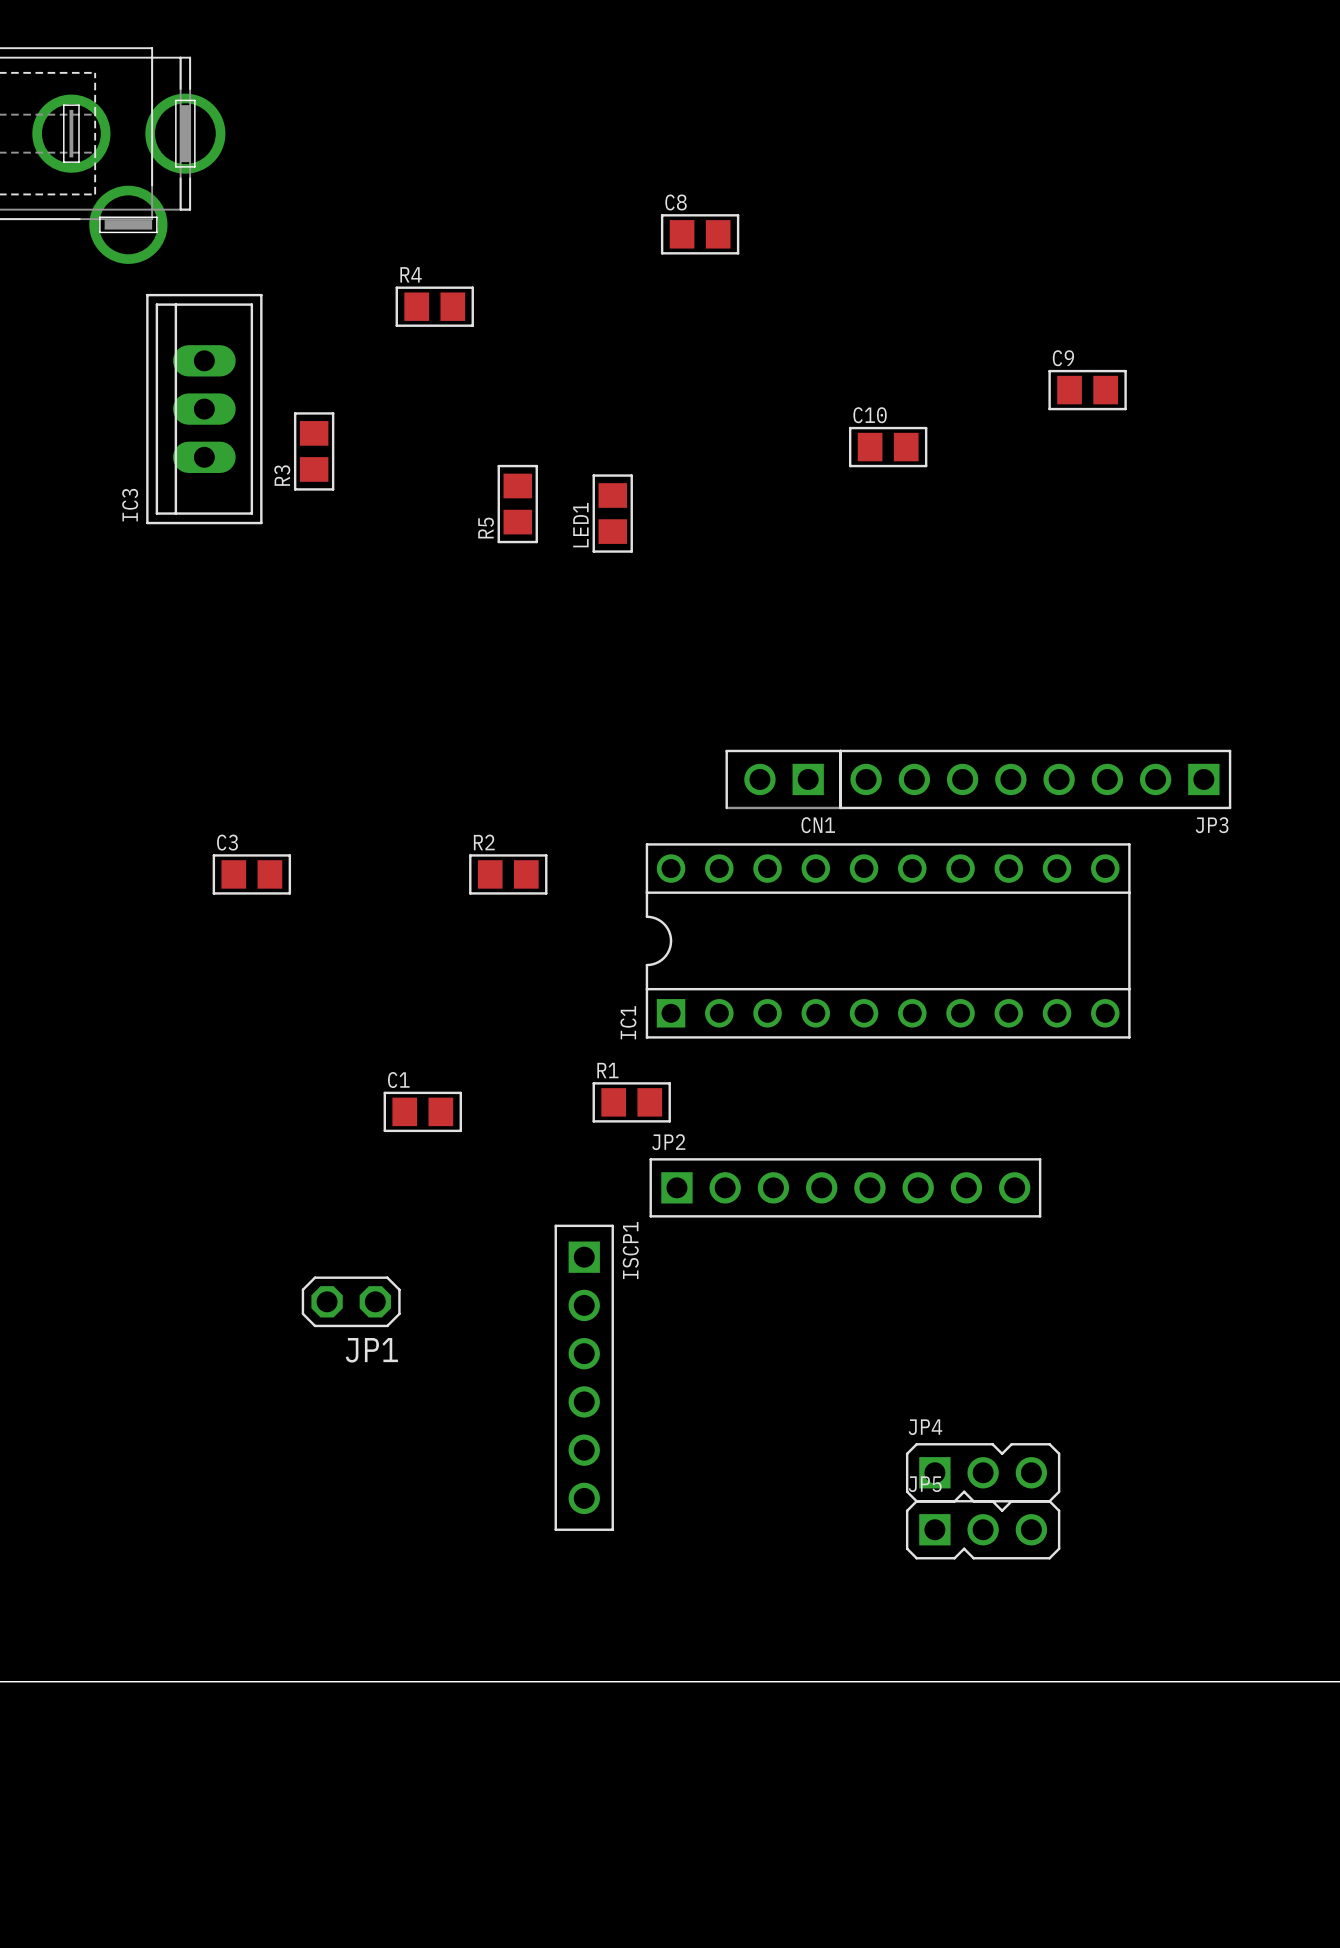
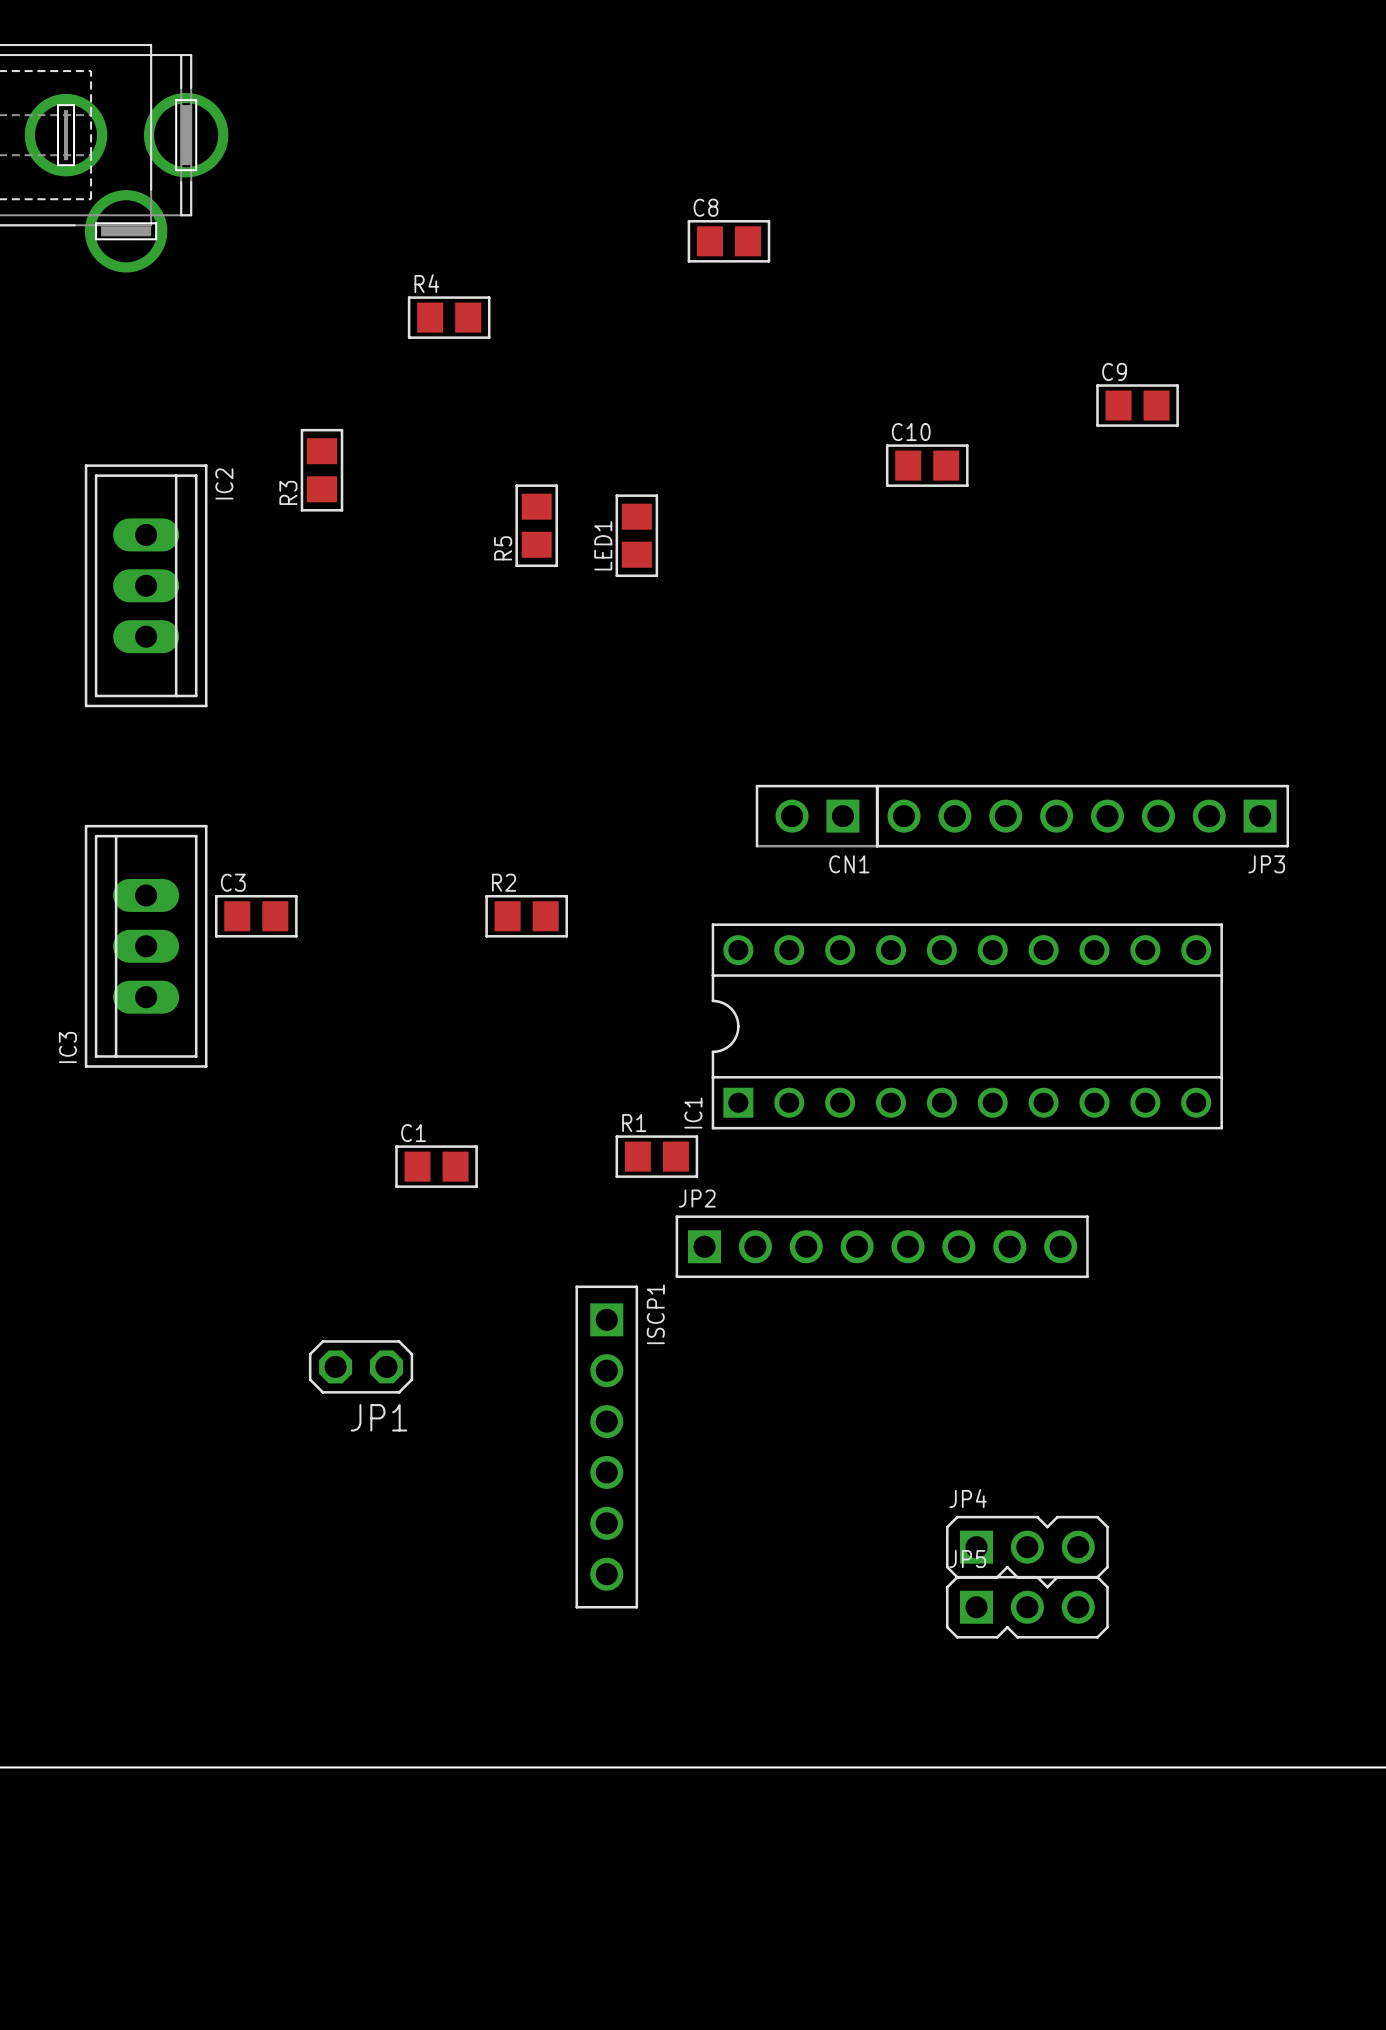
IC3 position: (204, 409) -> (146, 946)
IC2: none -> (146, 585)
IC1 position: (888, 940) -> (967, 1026)

